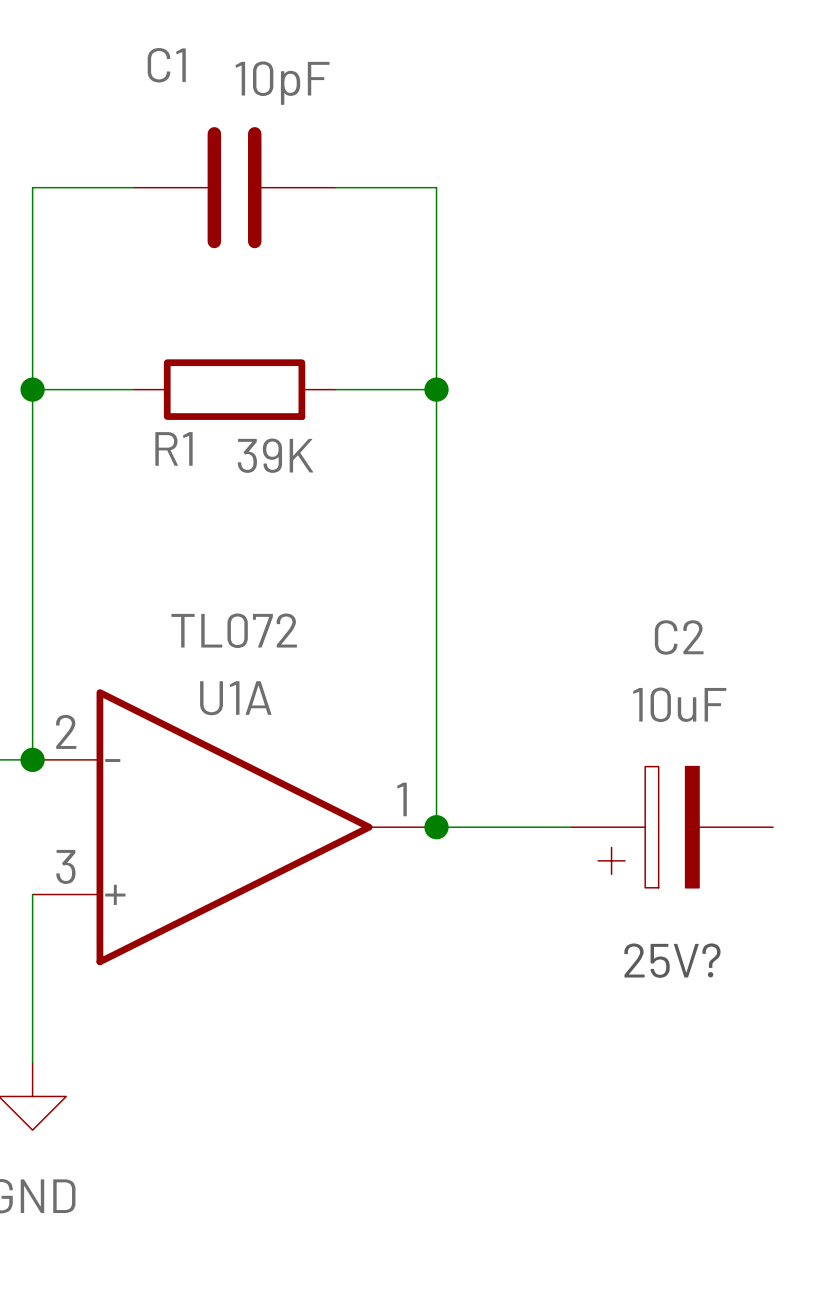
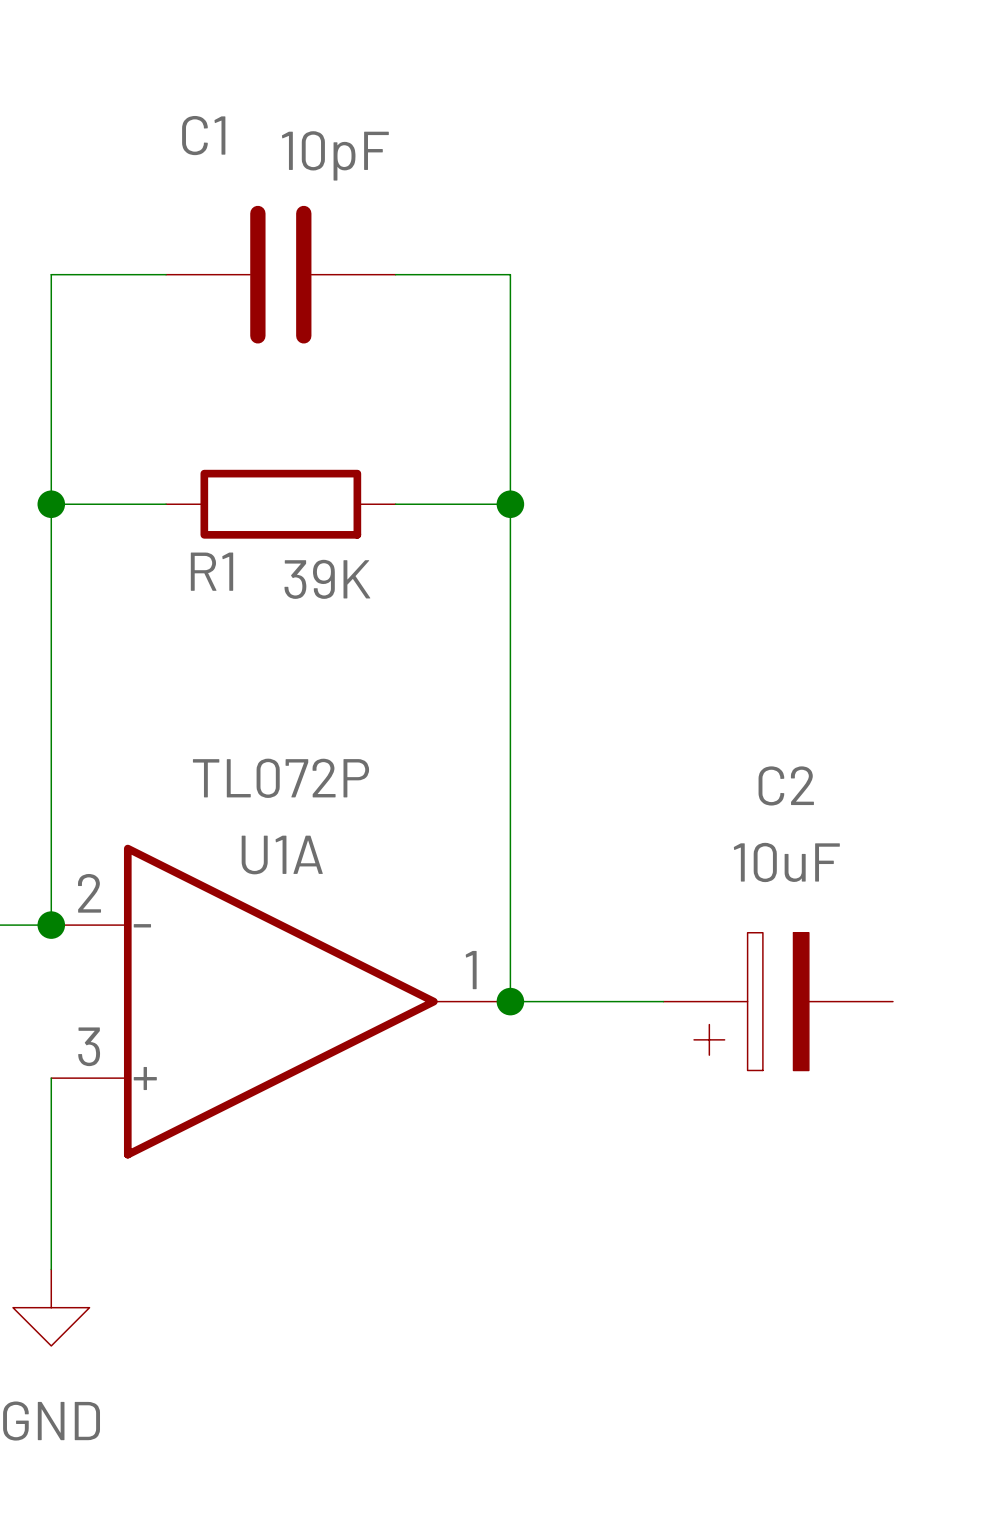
U1A value: TL072 (234, 630) -> TL072P (281, 778)
text: 25V? (672, 960) -> none

